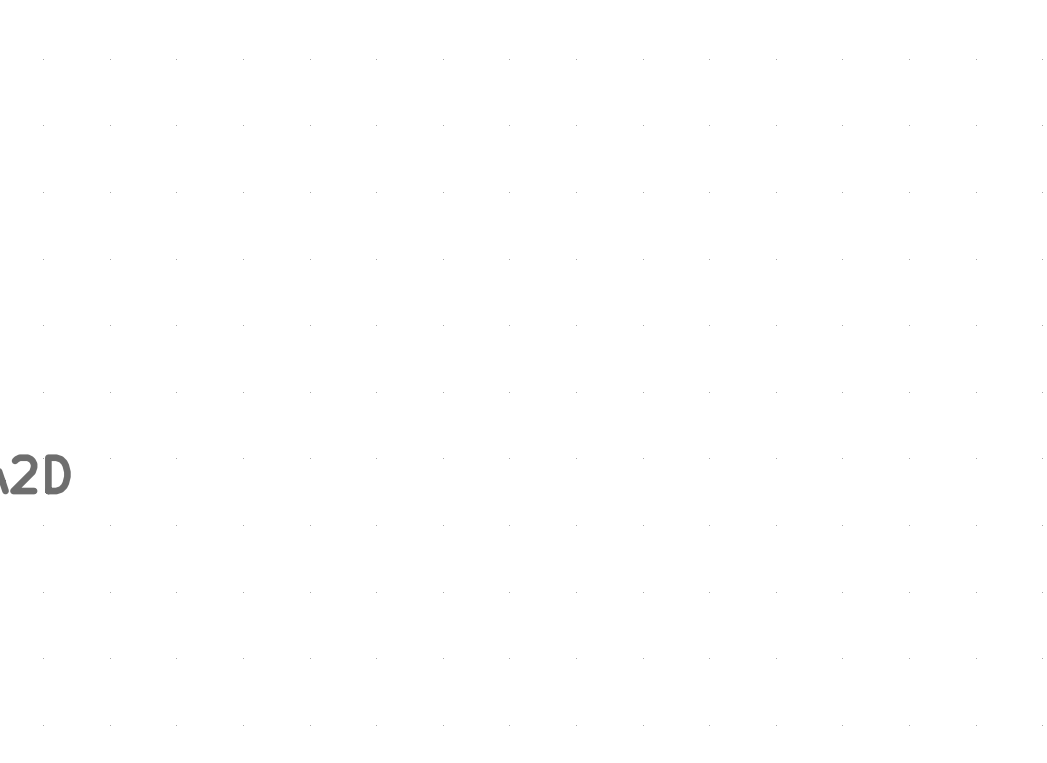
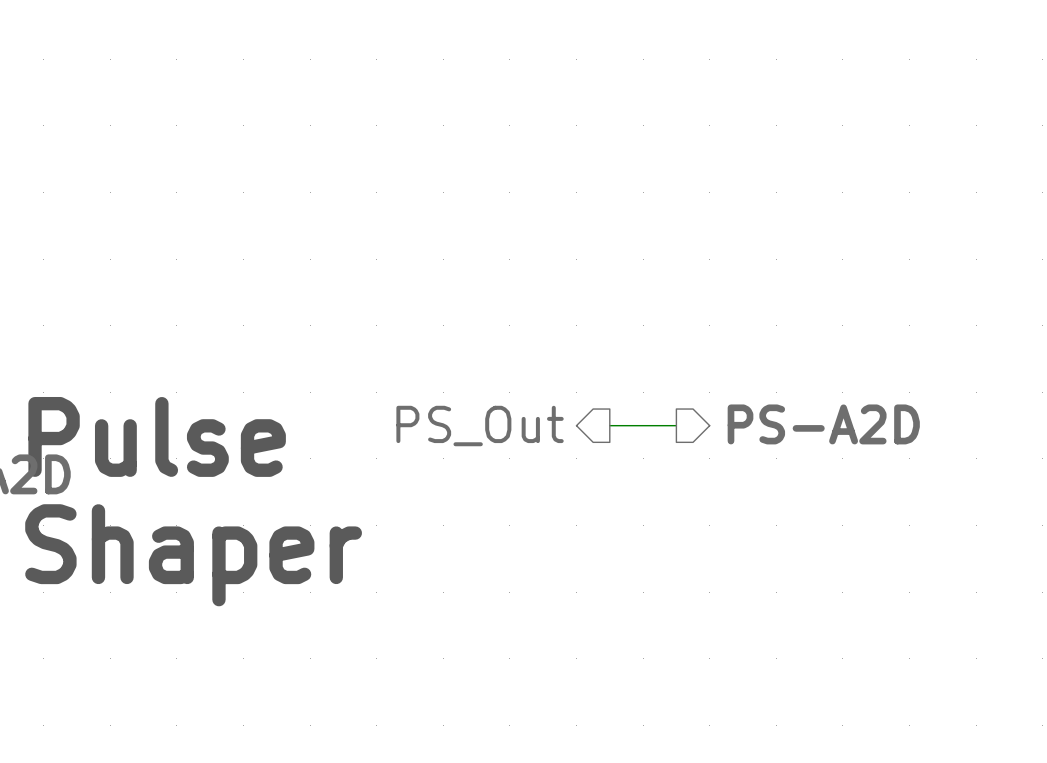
hierarchical label: none -> PS-A2D (823, 424)
wire: none -> (609, 425) (676, 425)
sheet pin: none -> PS_Out (480, 426)
text: none -> Pulse (157, 436)
text: none -> Shaper (193, 555)

